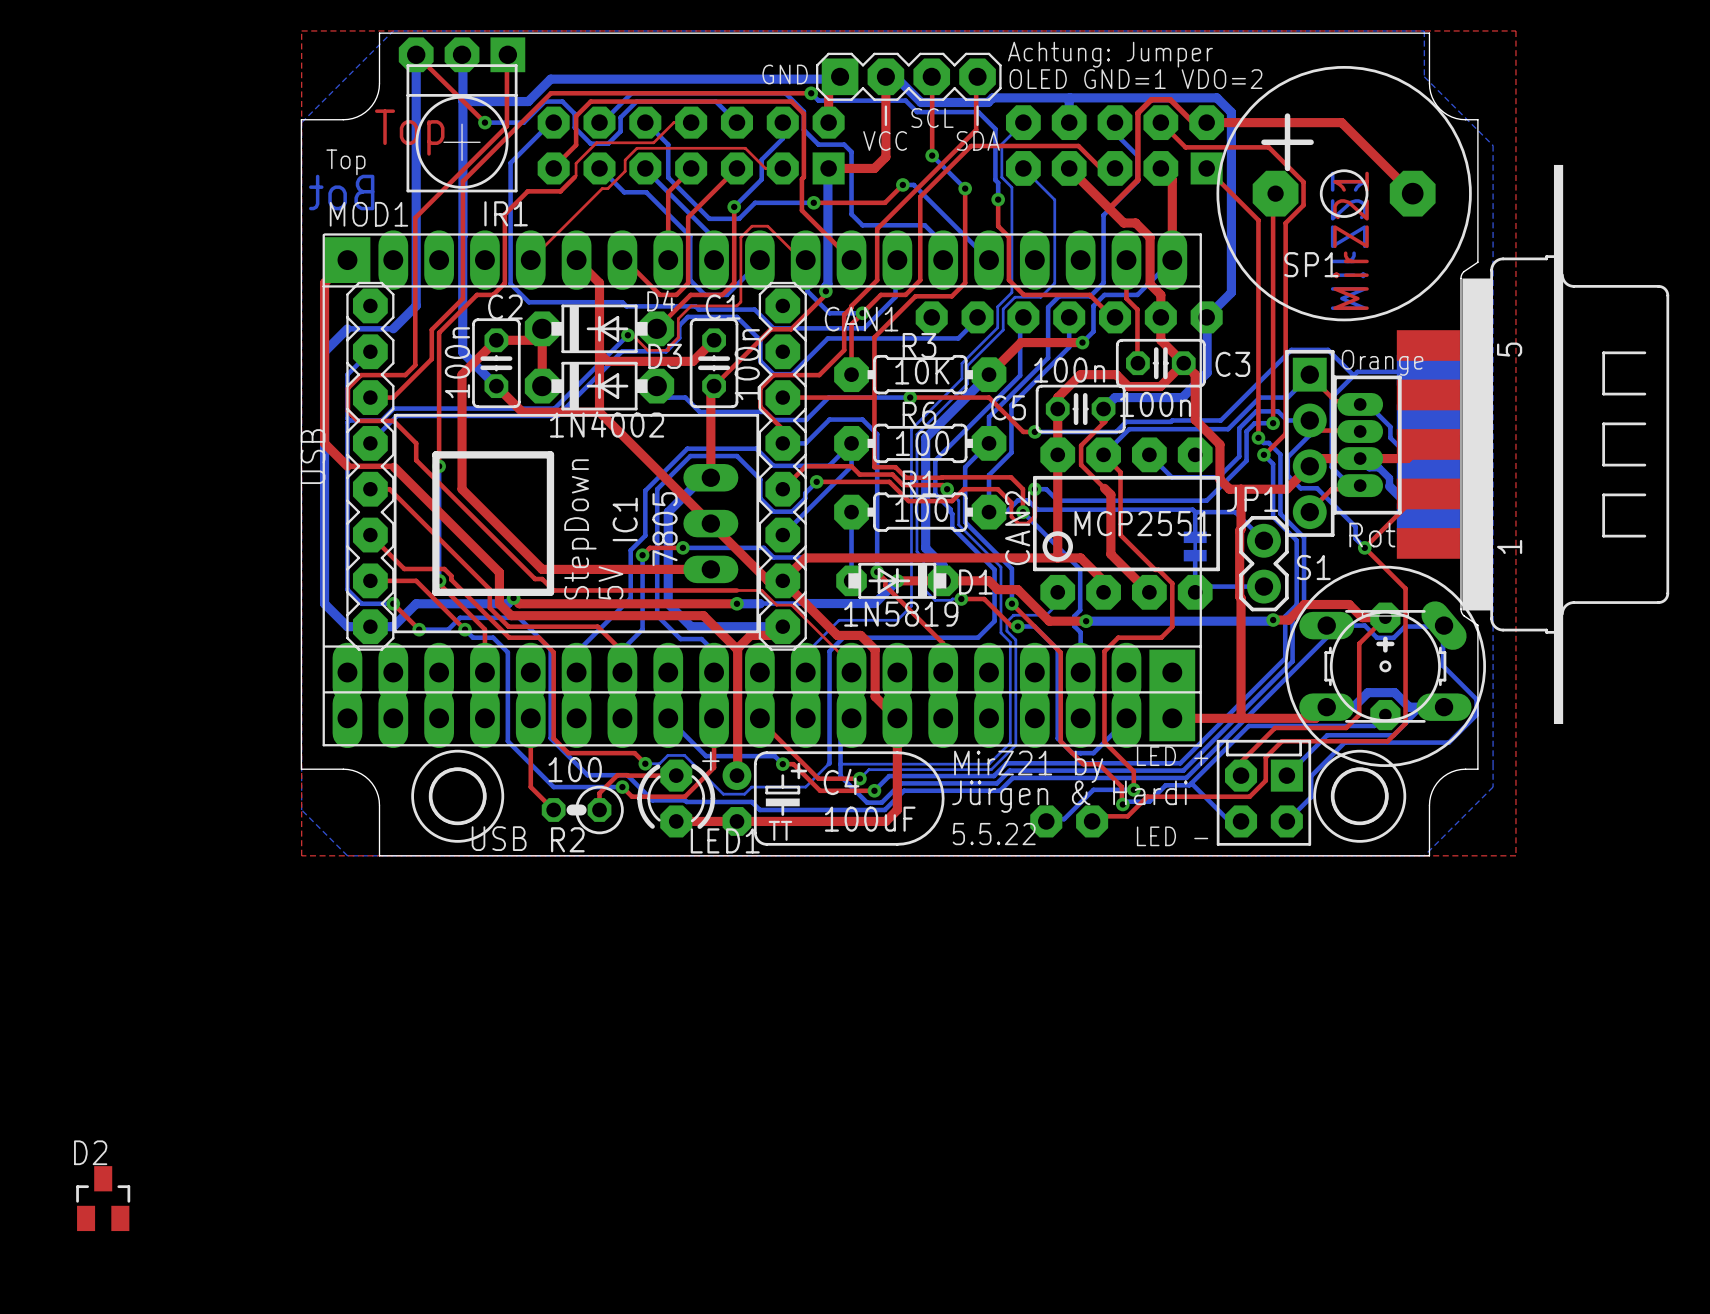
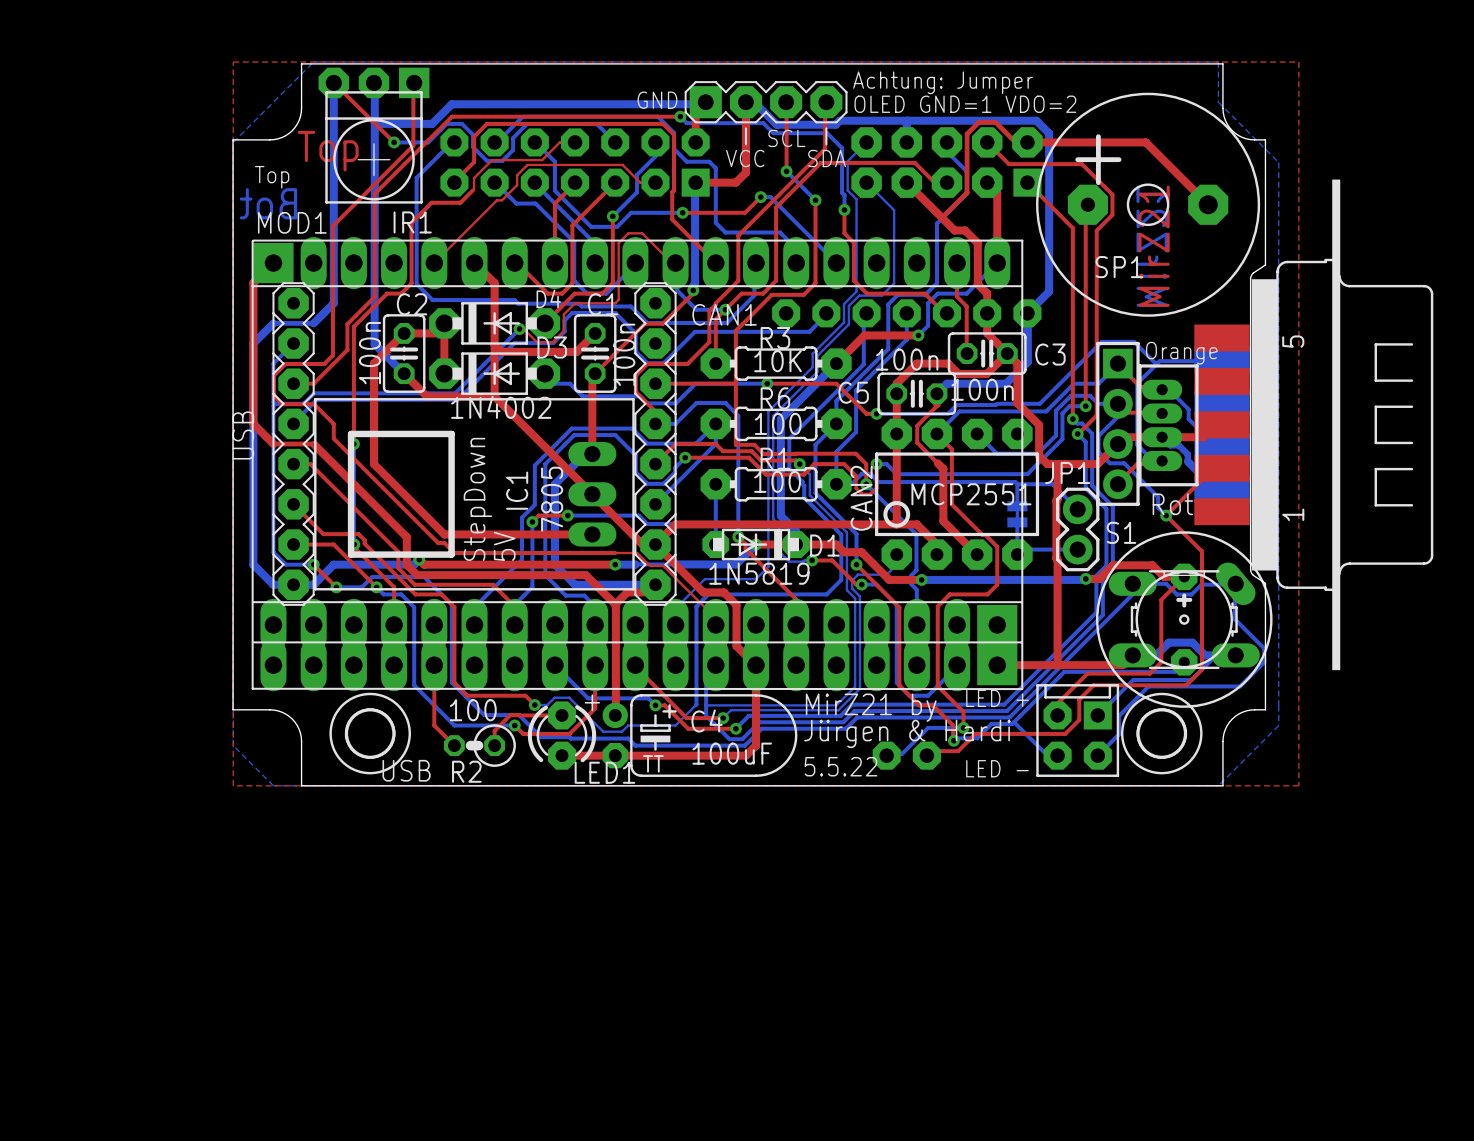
D2: (103, 1198) -> none

